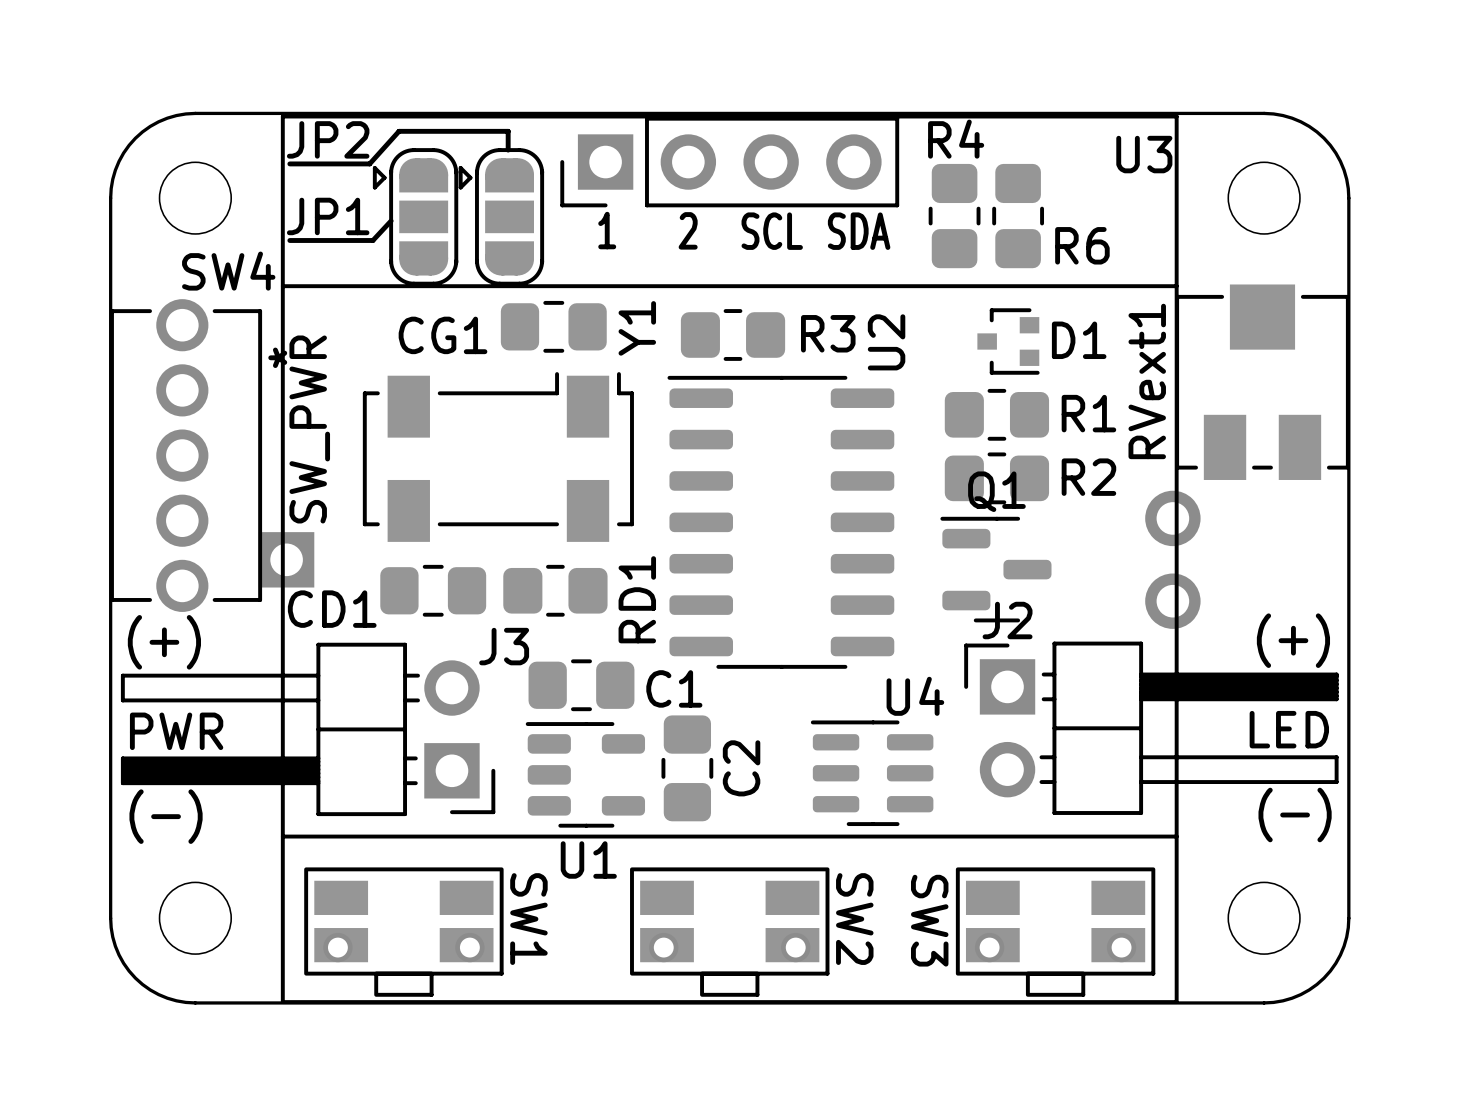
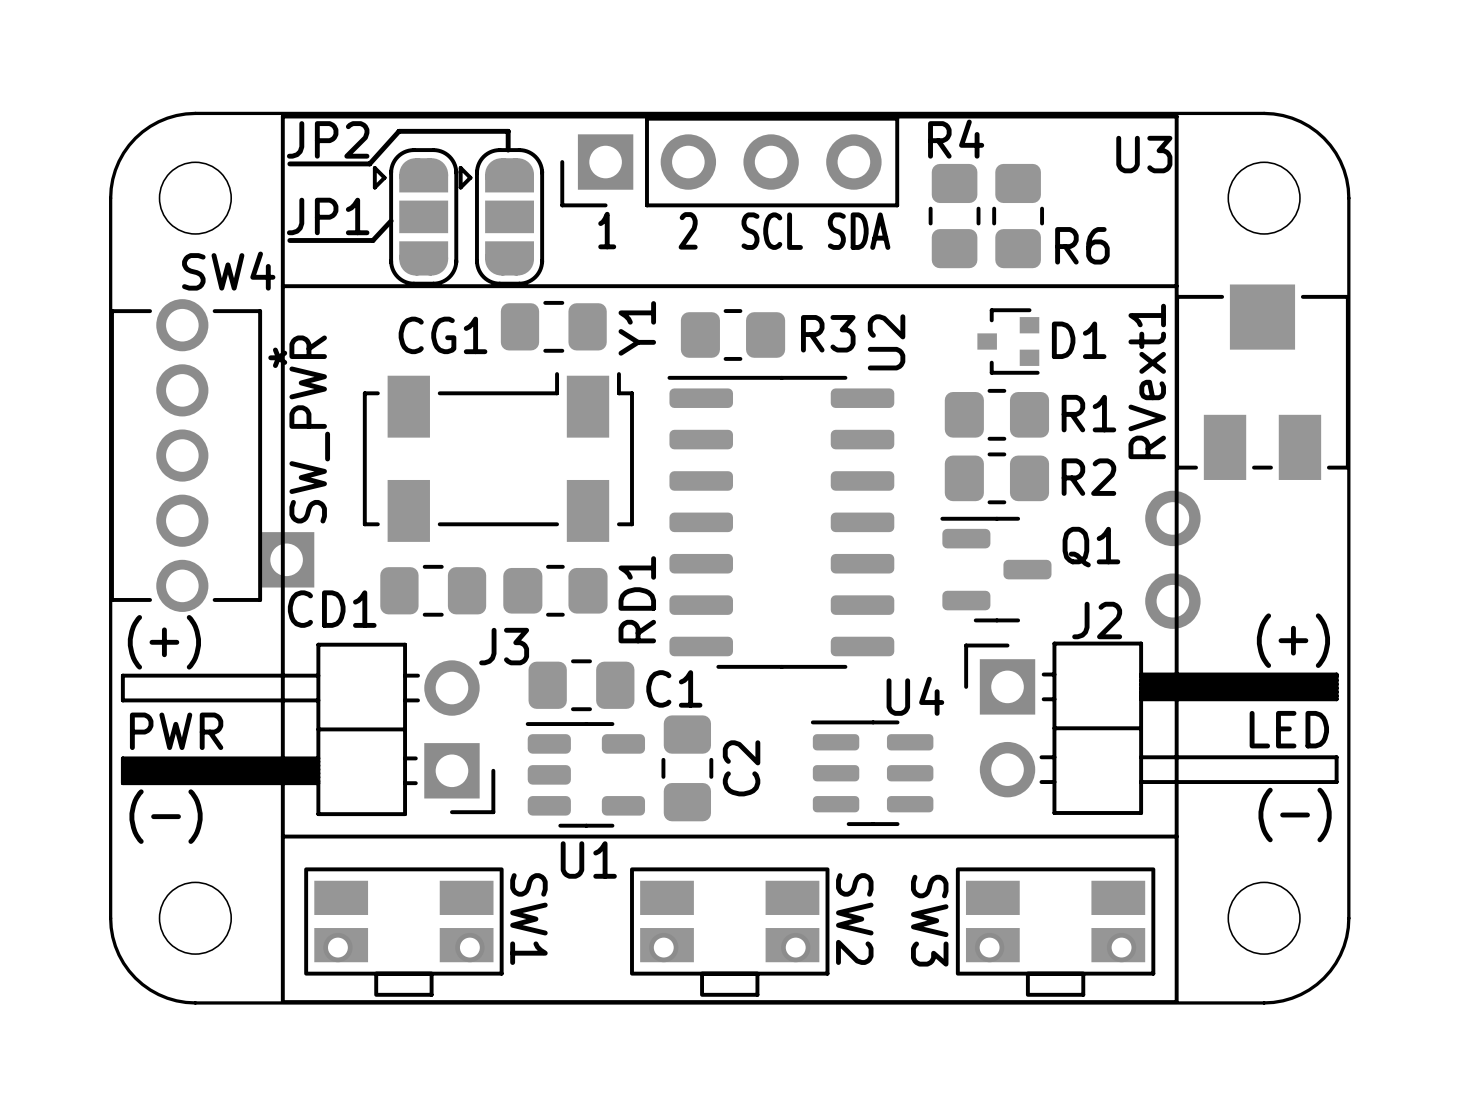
Q1 name position: Q1 (996, 491) -> Q1 (1091, 547)
J2 name position: J2 (1007, 620) -> J2 (1097, 620)

